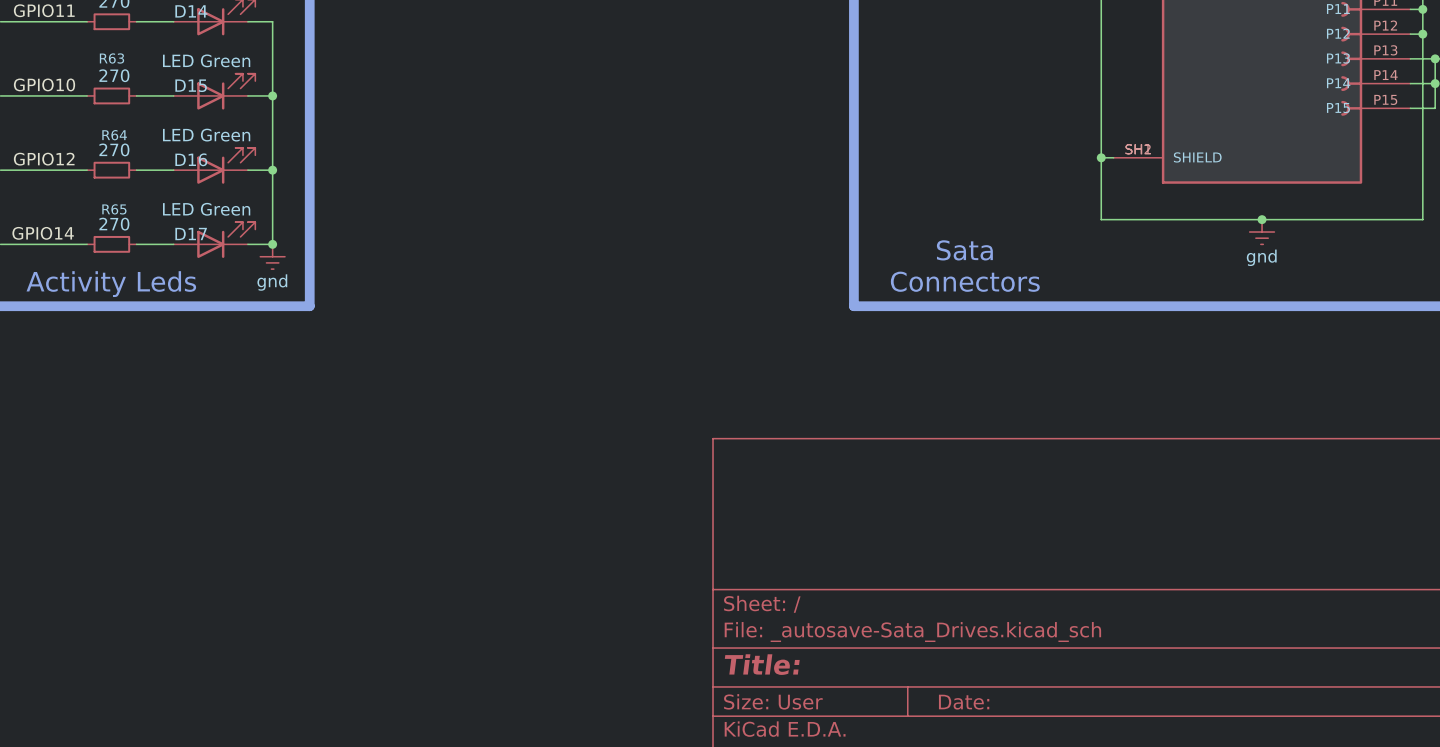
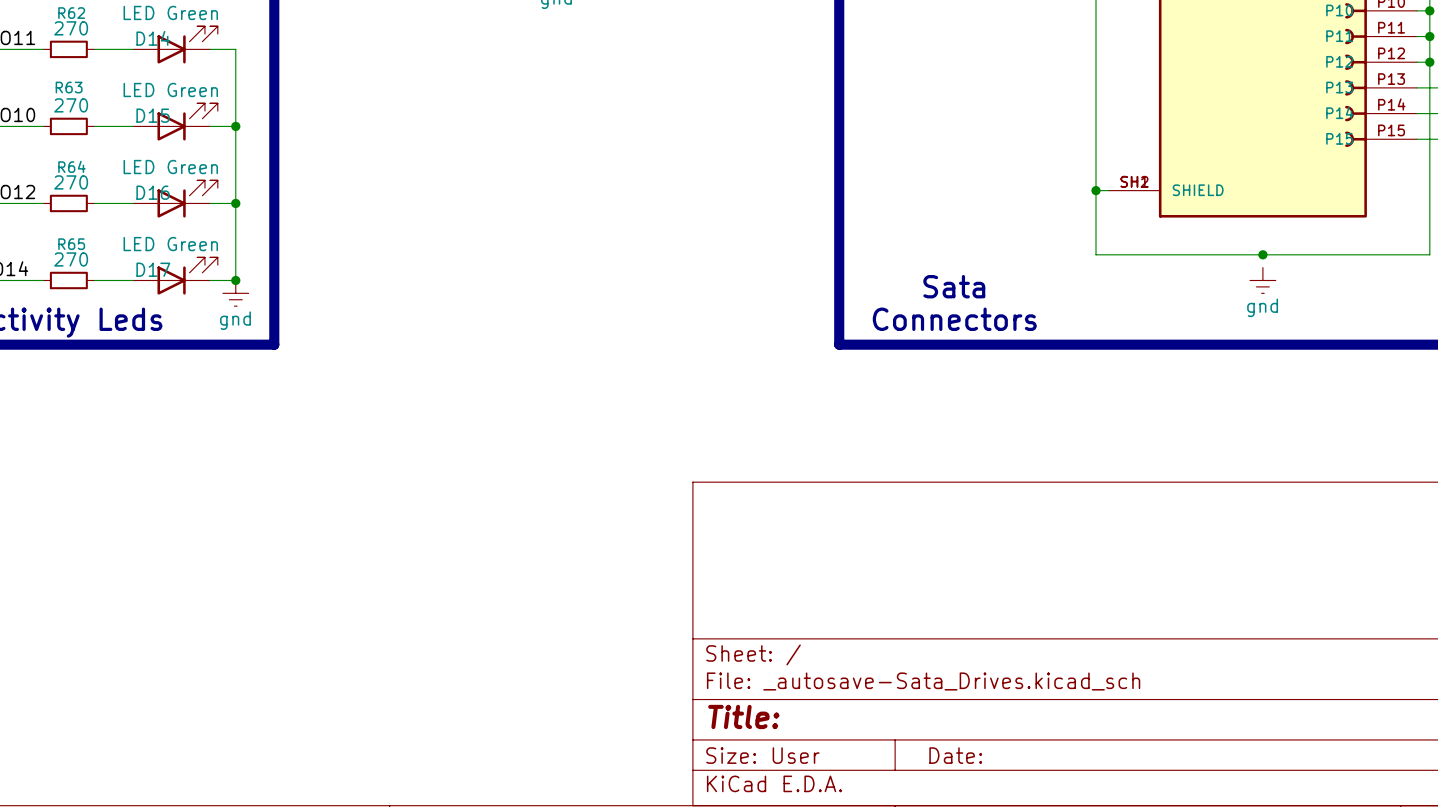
power symbol position: gnd (1262, 232) -> gnd (1262, 280)

